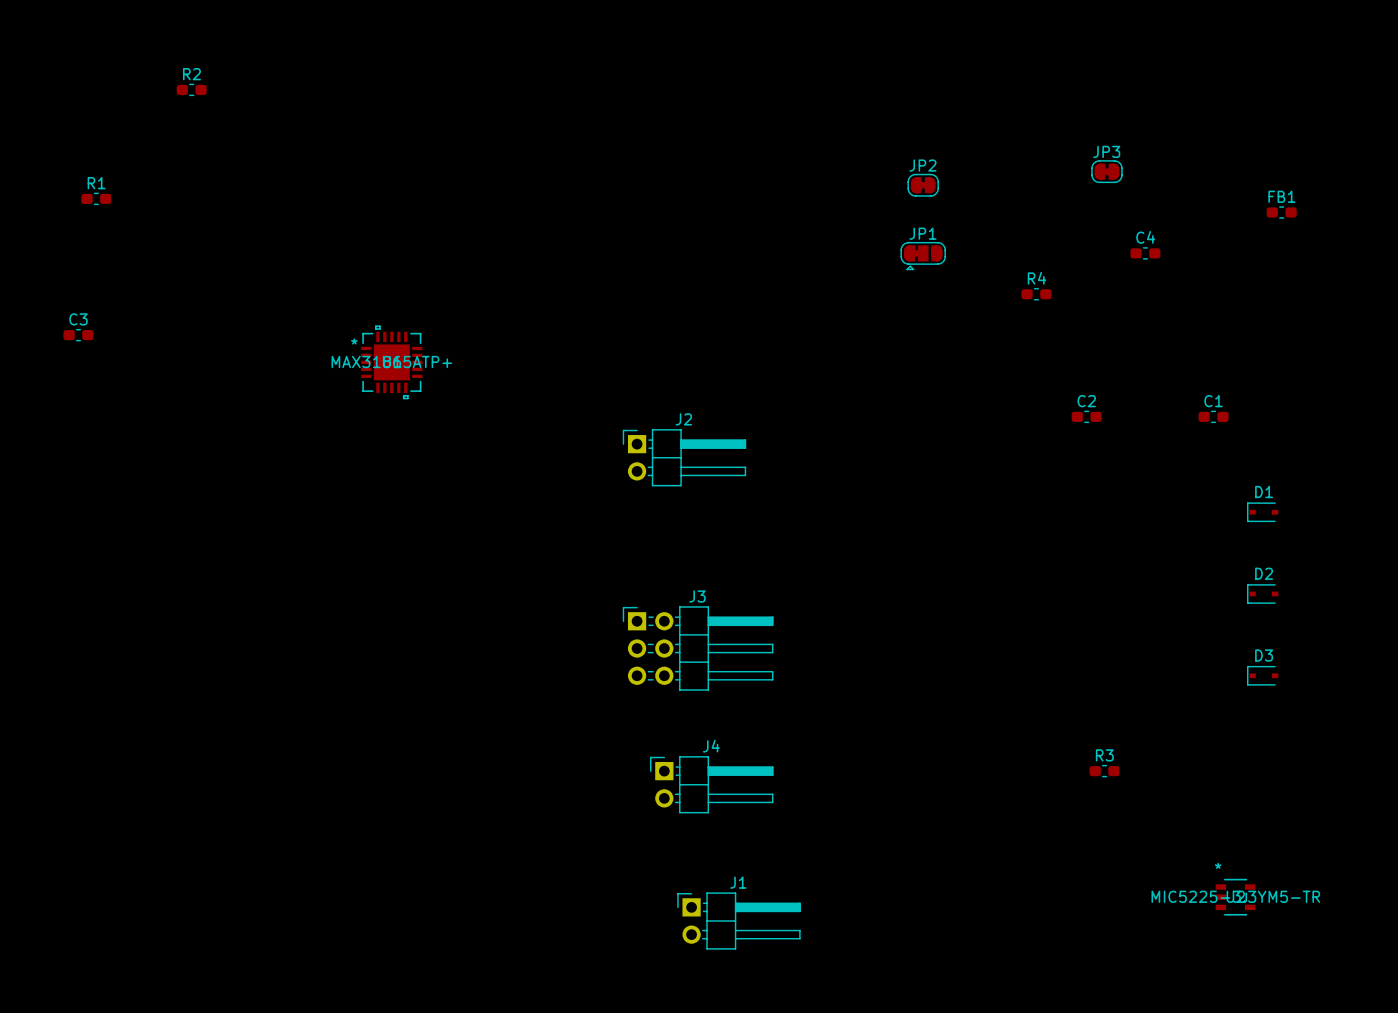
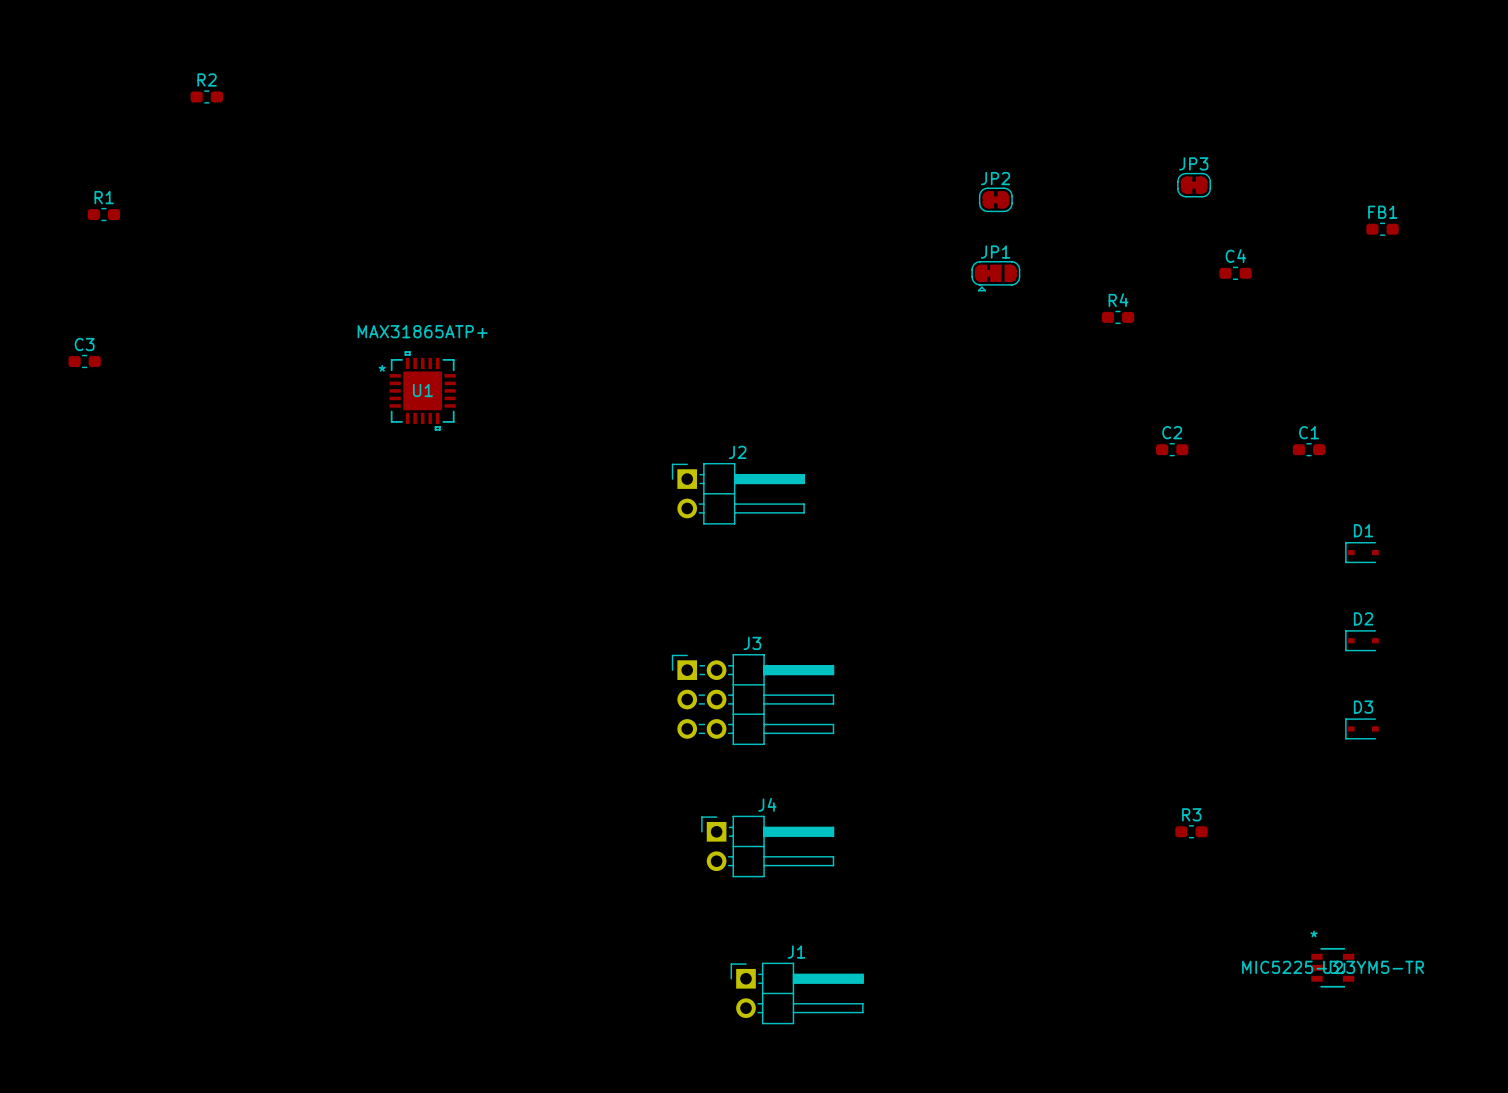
U1 value position: MAX31865ATP+ (391, 361) -> MAX31865ATP+ (422, 331)

